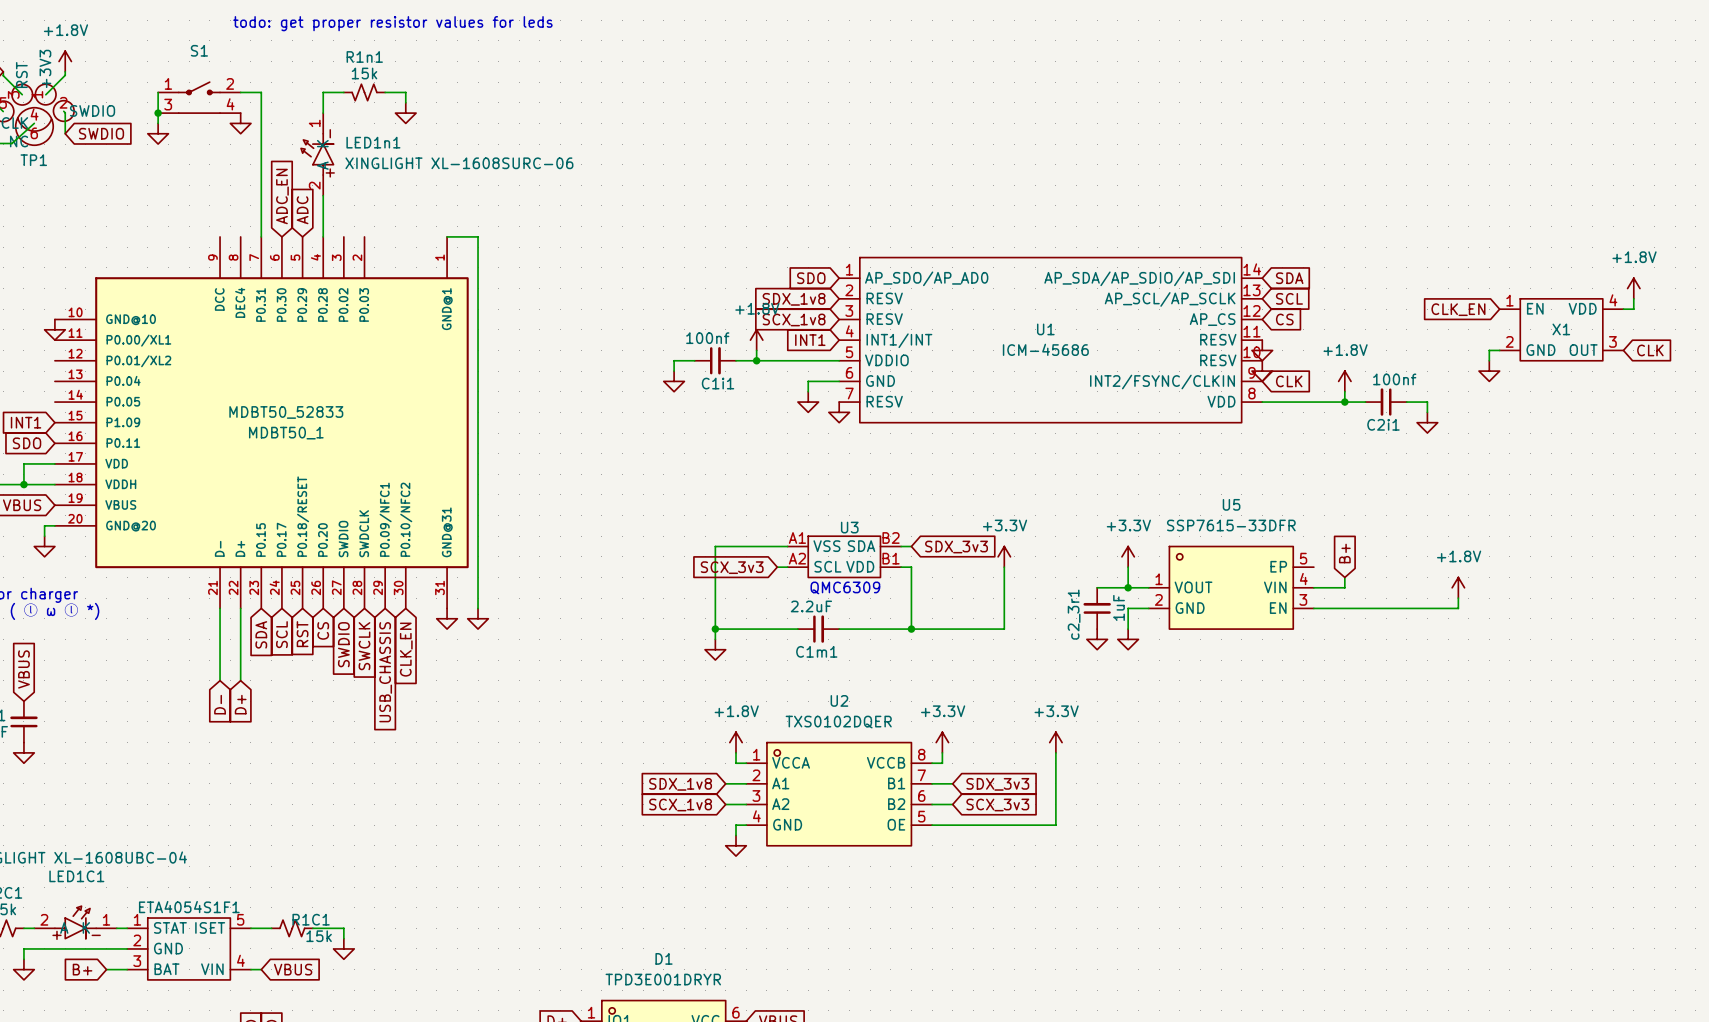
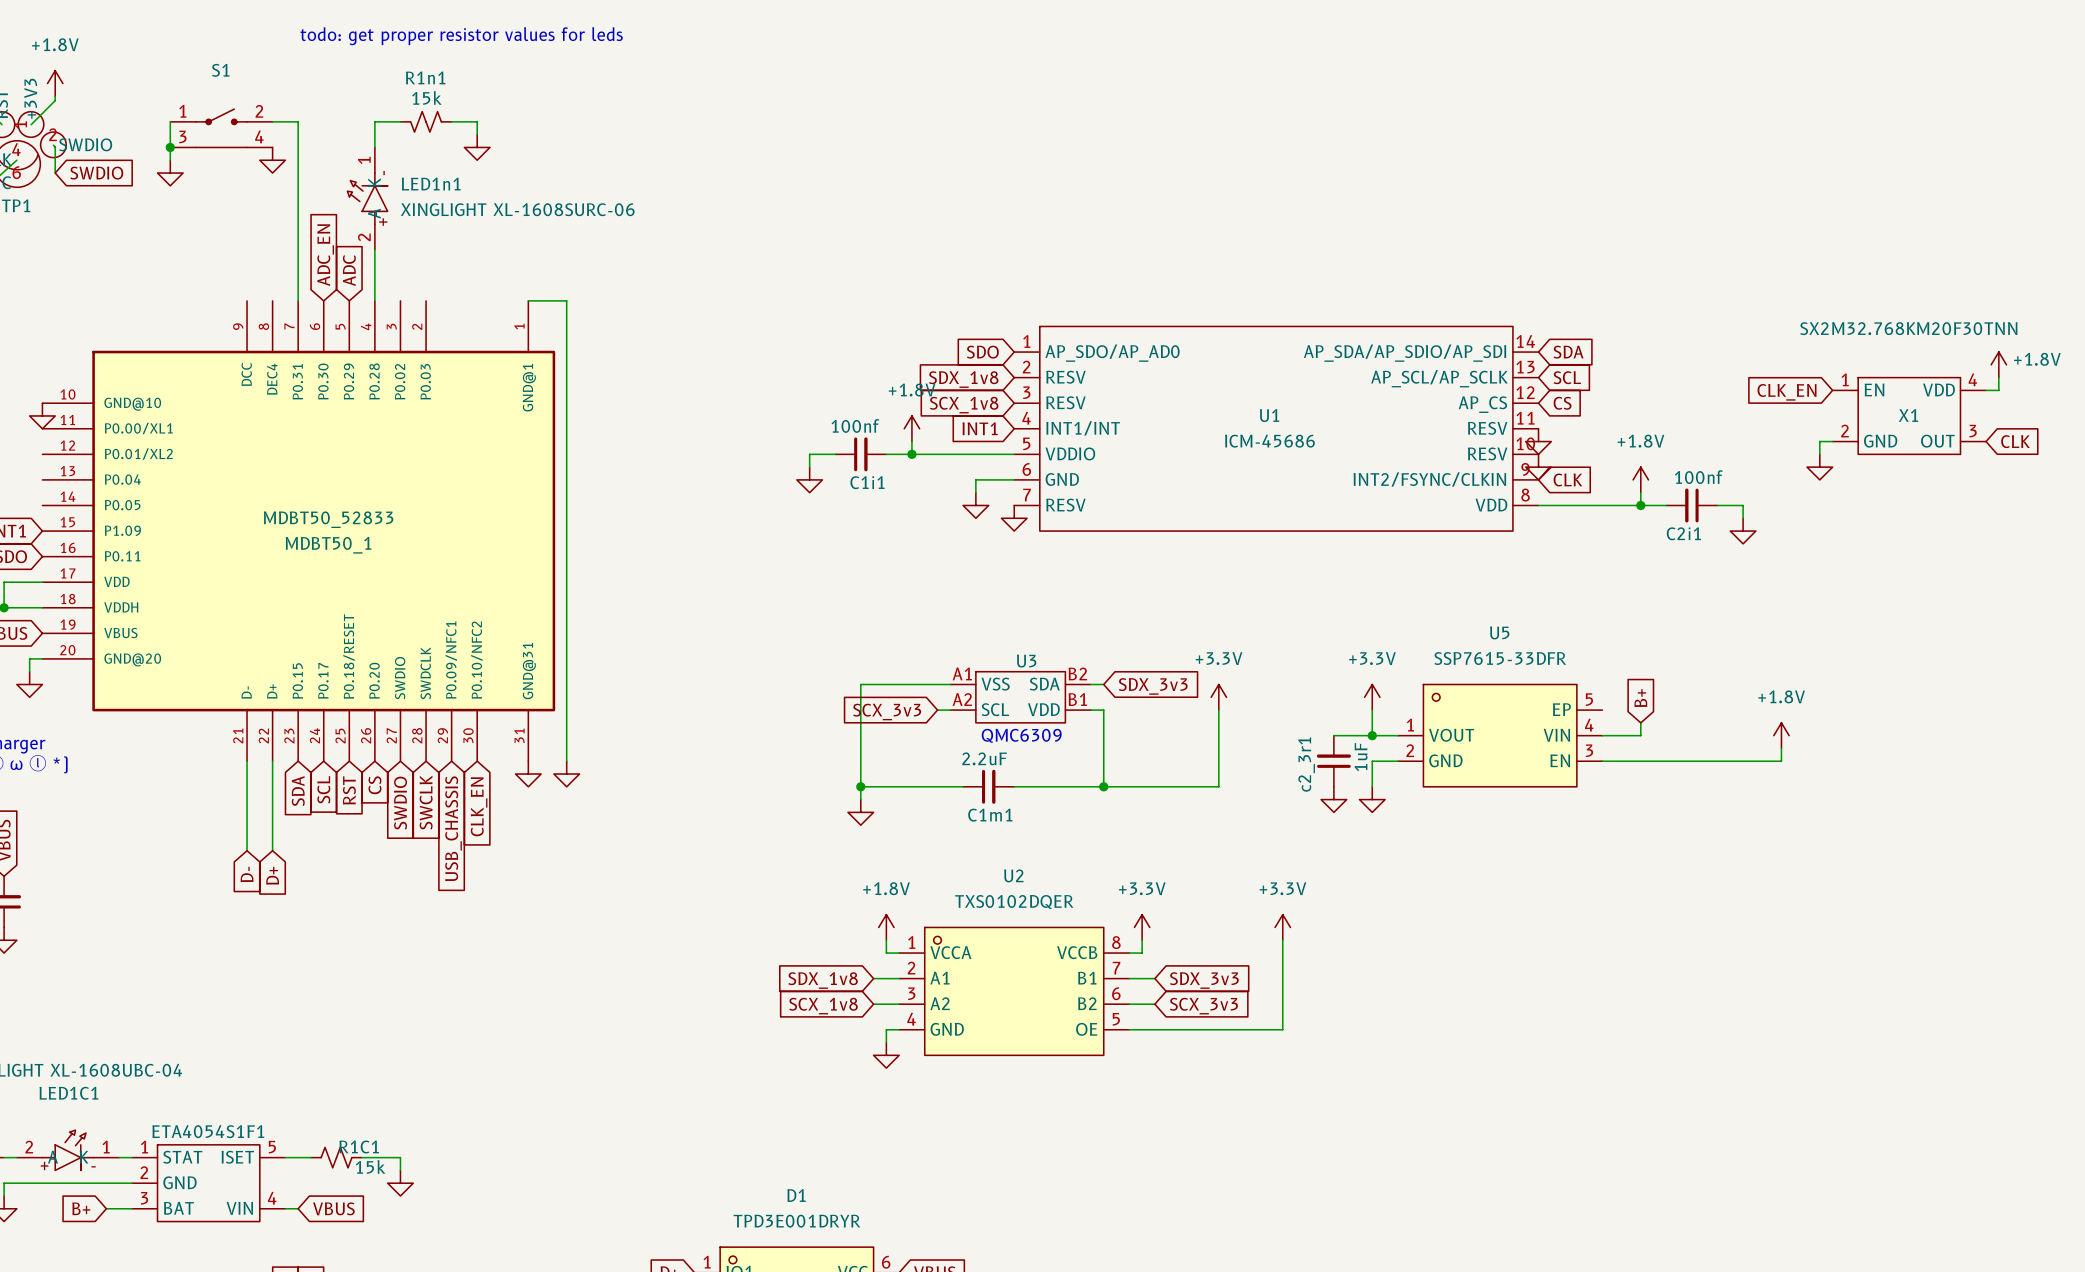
power symbol text position: +1.8V (1634, 257) -> +1.8V (2037, 359)
X1 value: none -> SX2M32.768KM20F30TNN (1908, 328)

